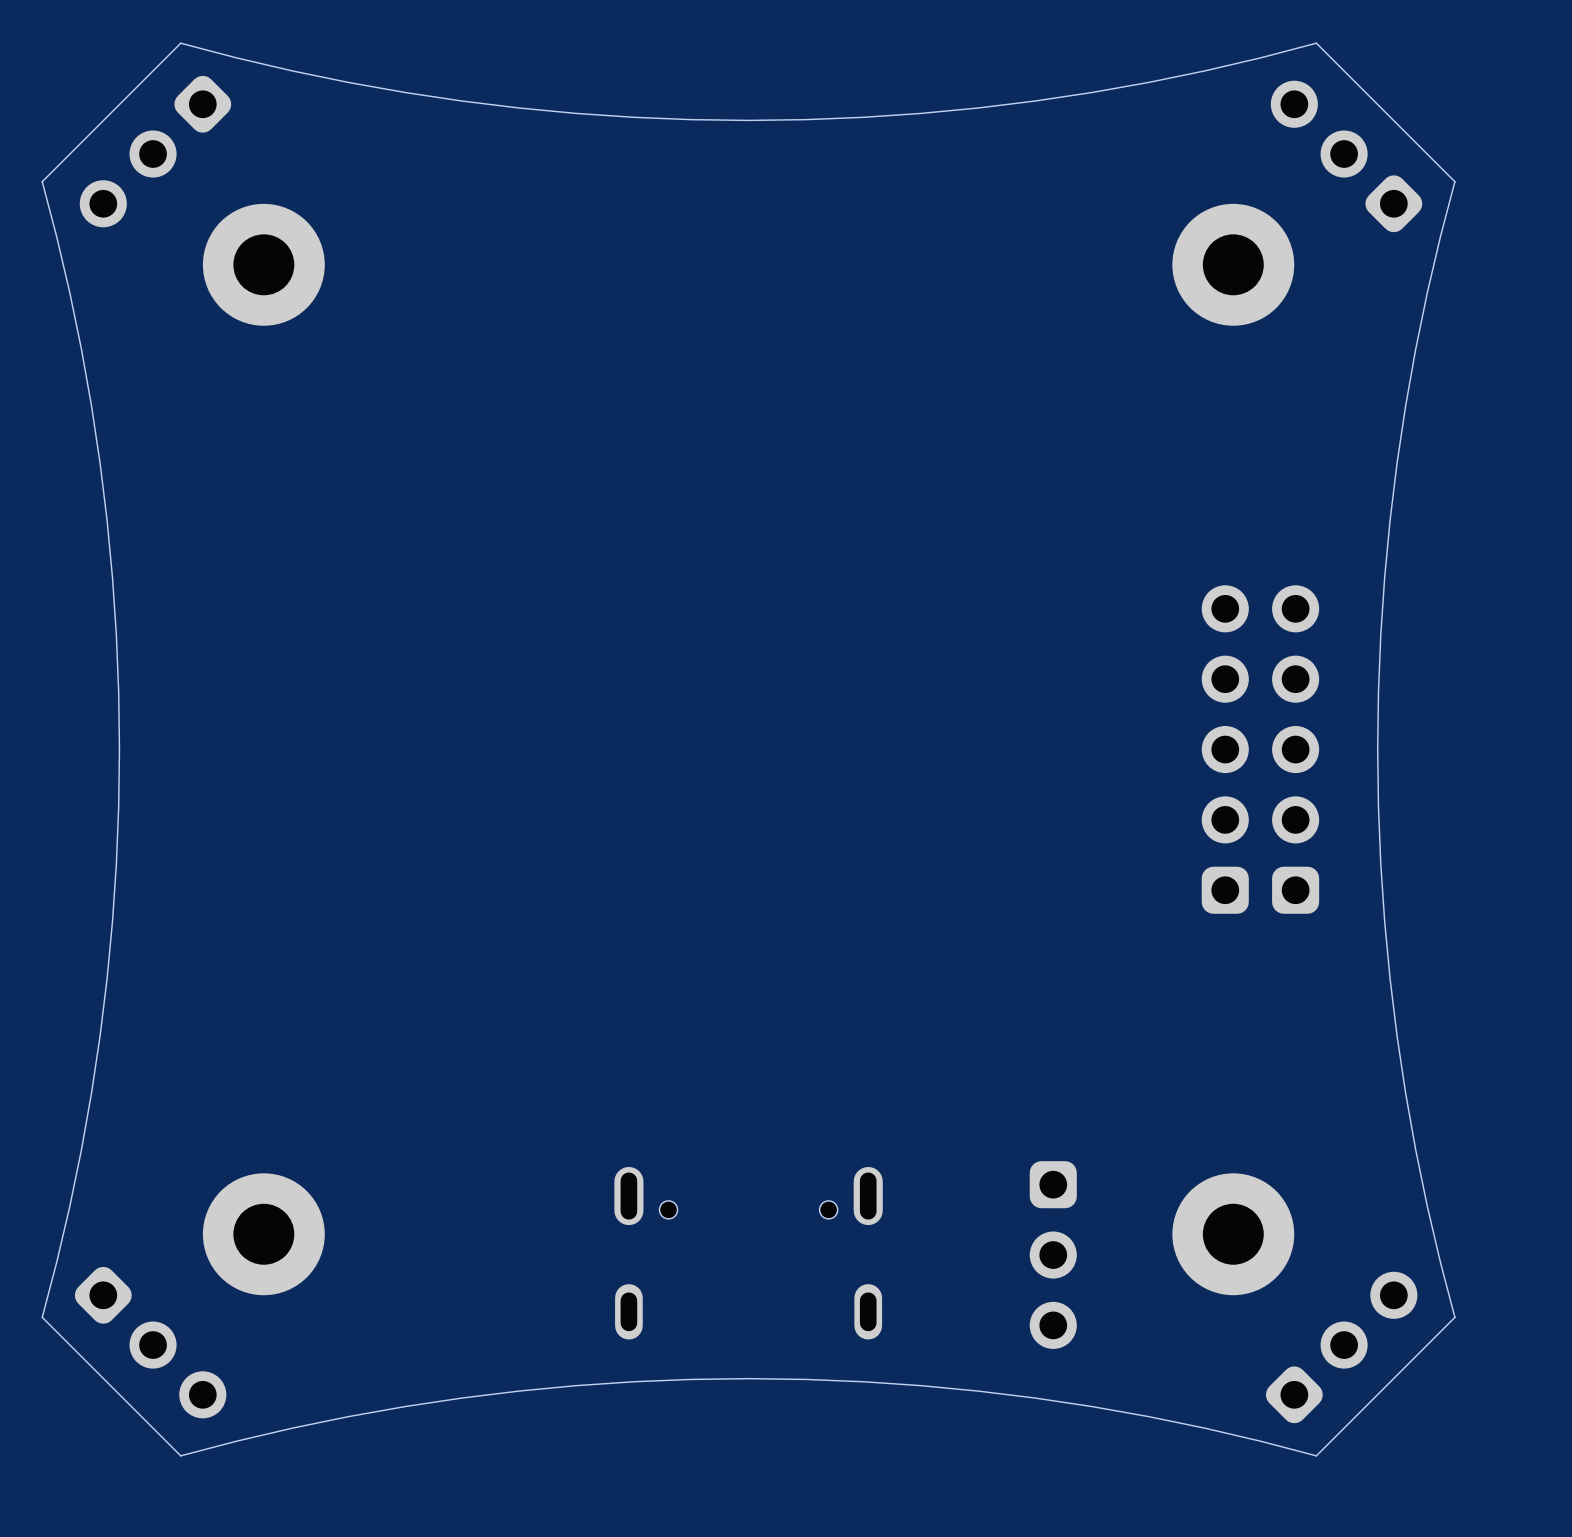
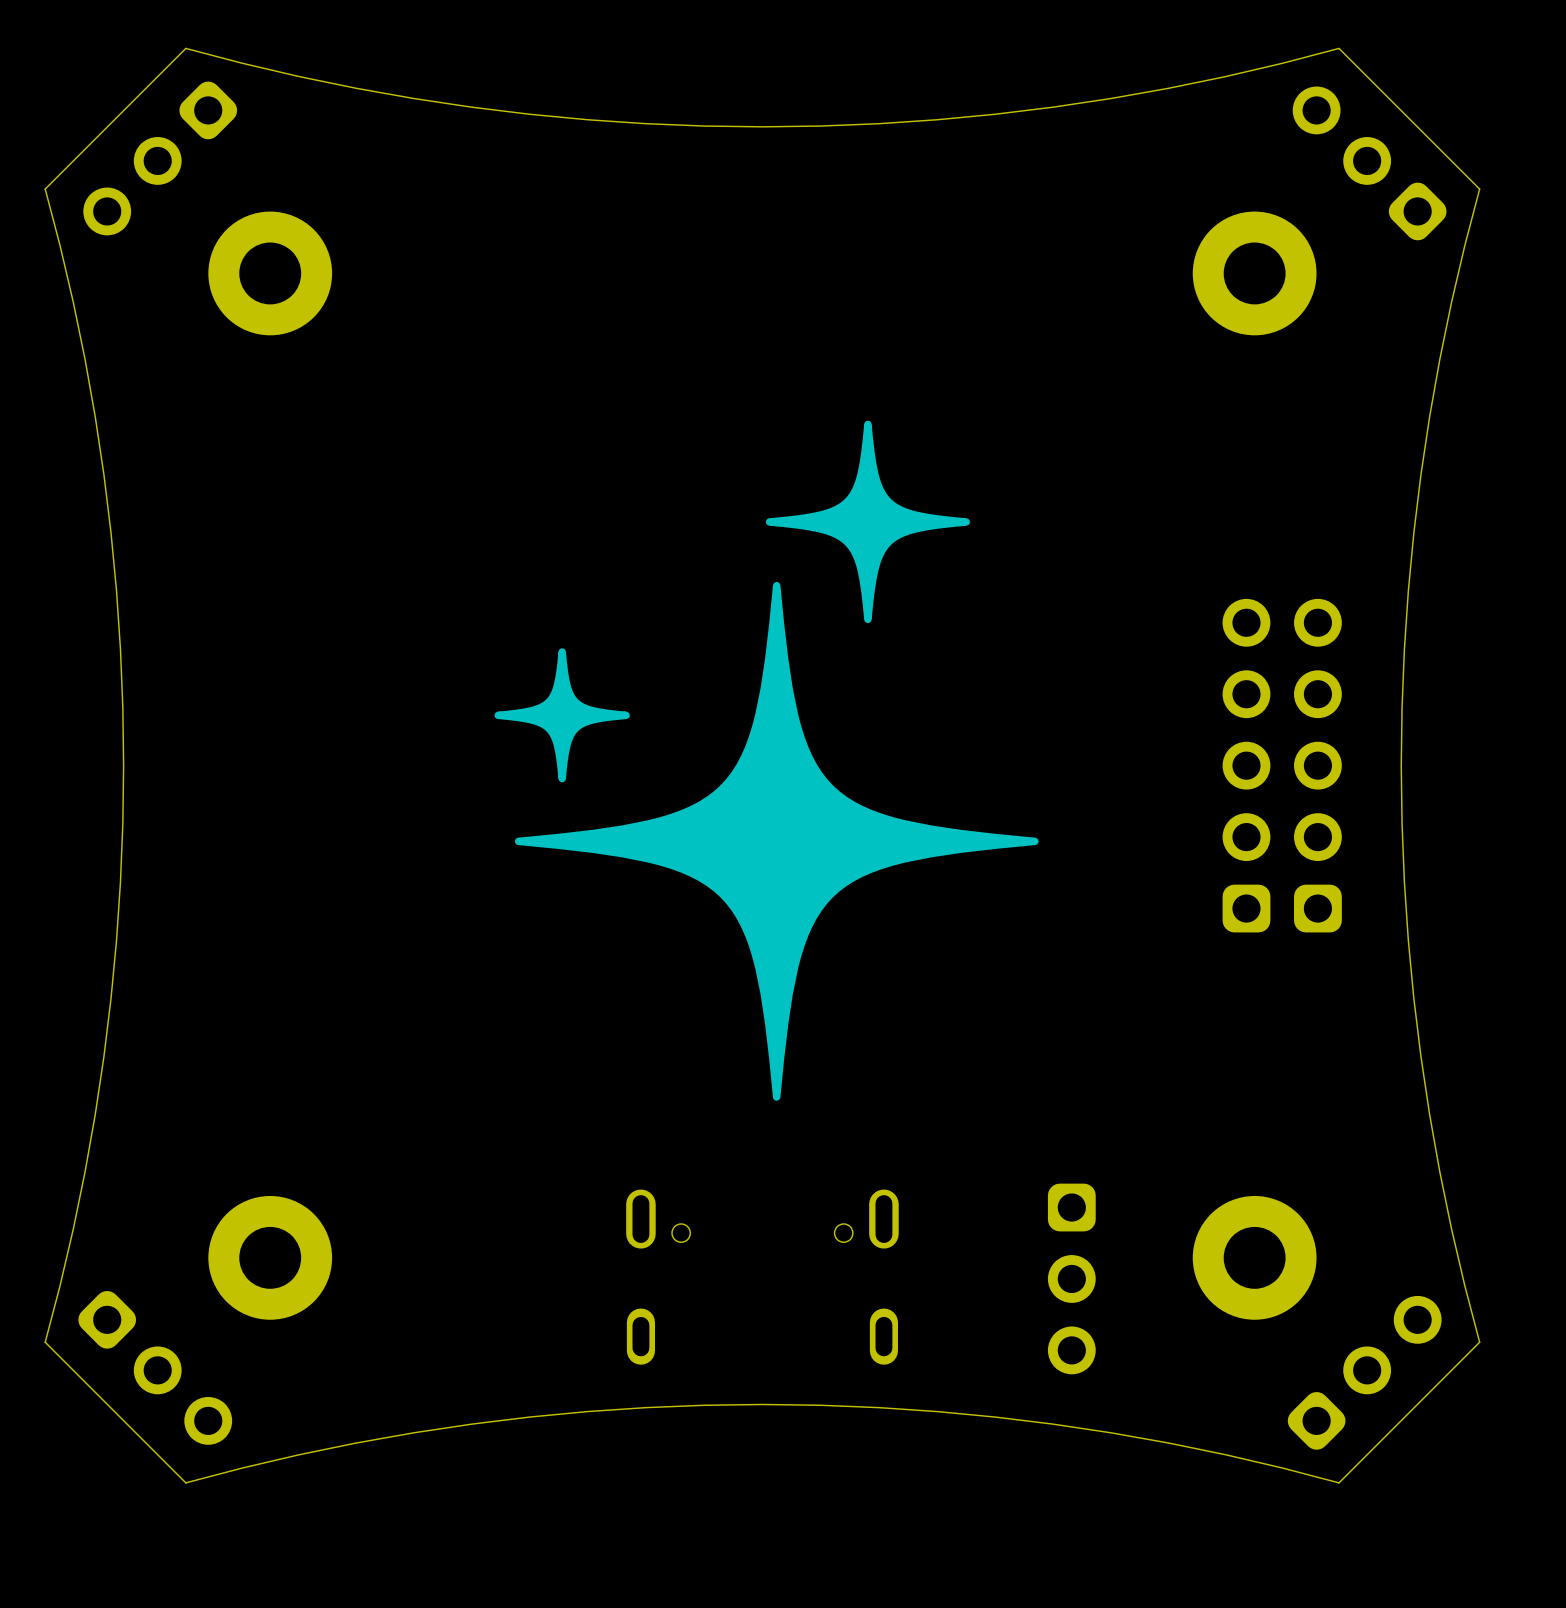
drawing: none -> [494, 420, 1039, 1101]

